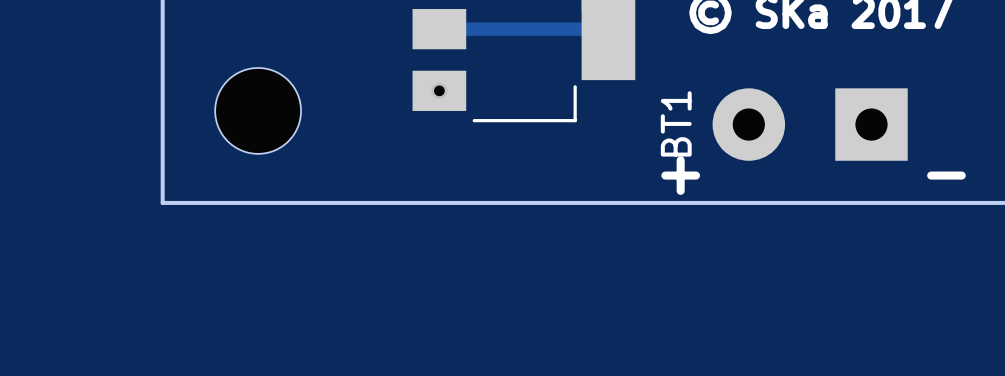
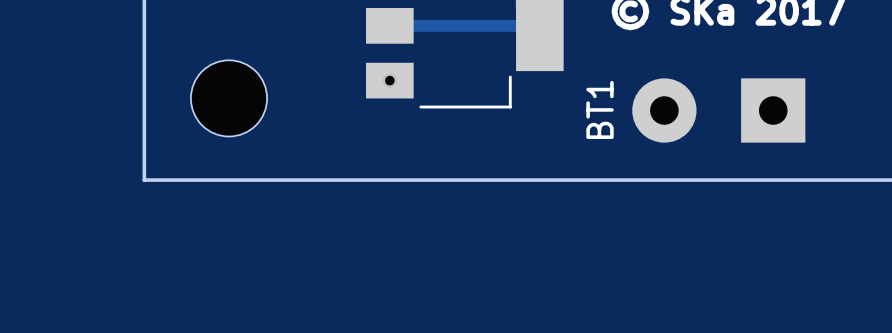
text: + (680, 175) -> none
text: - (946, 175) -> none

